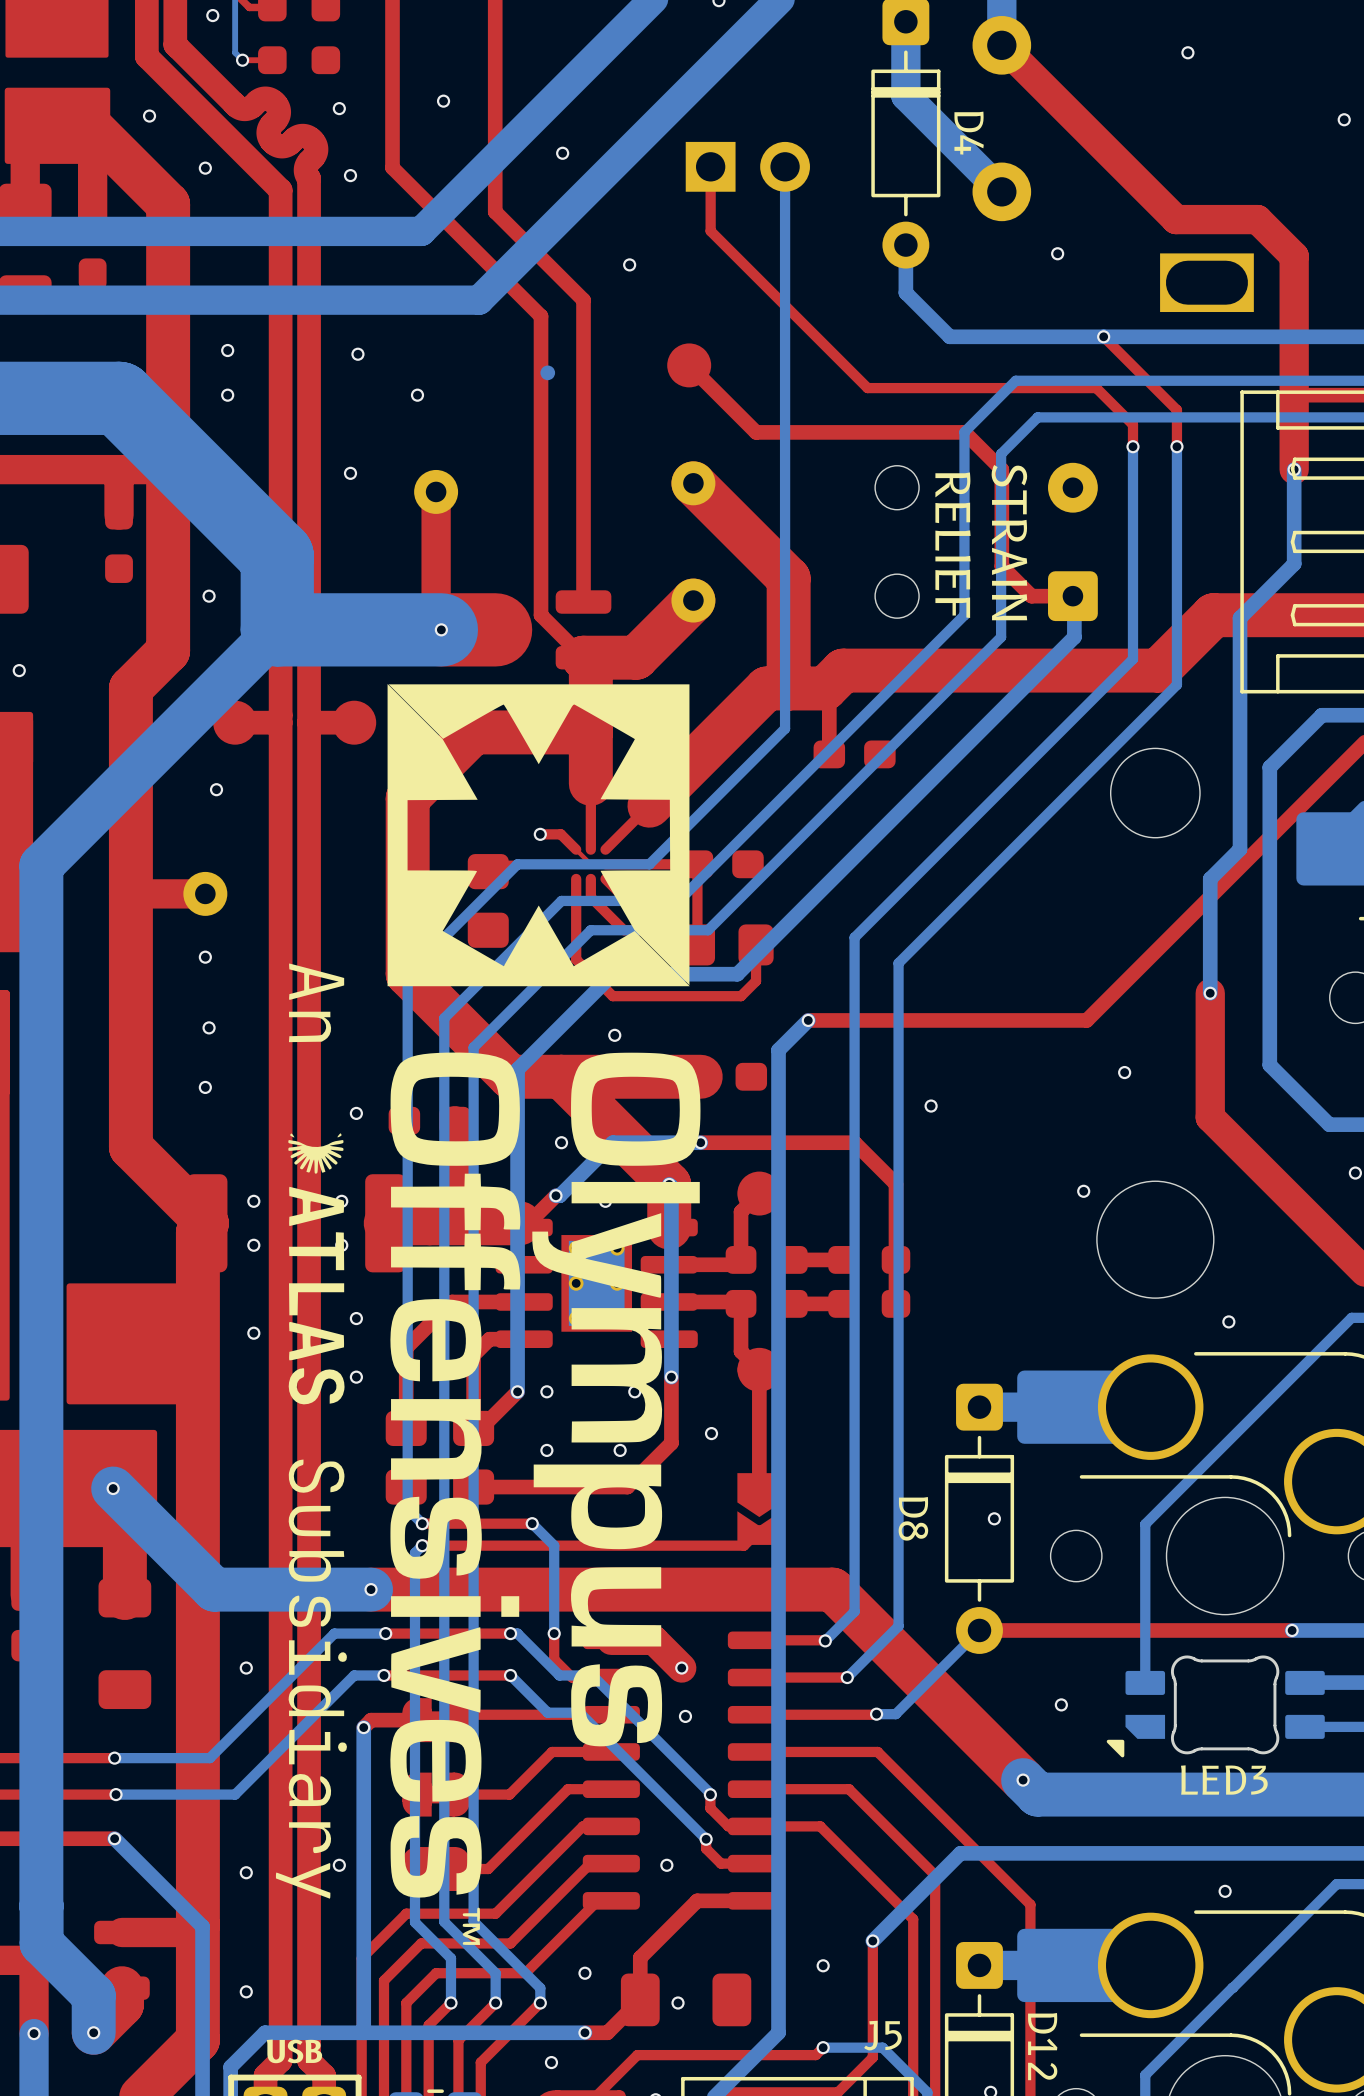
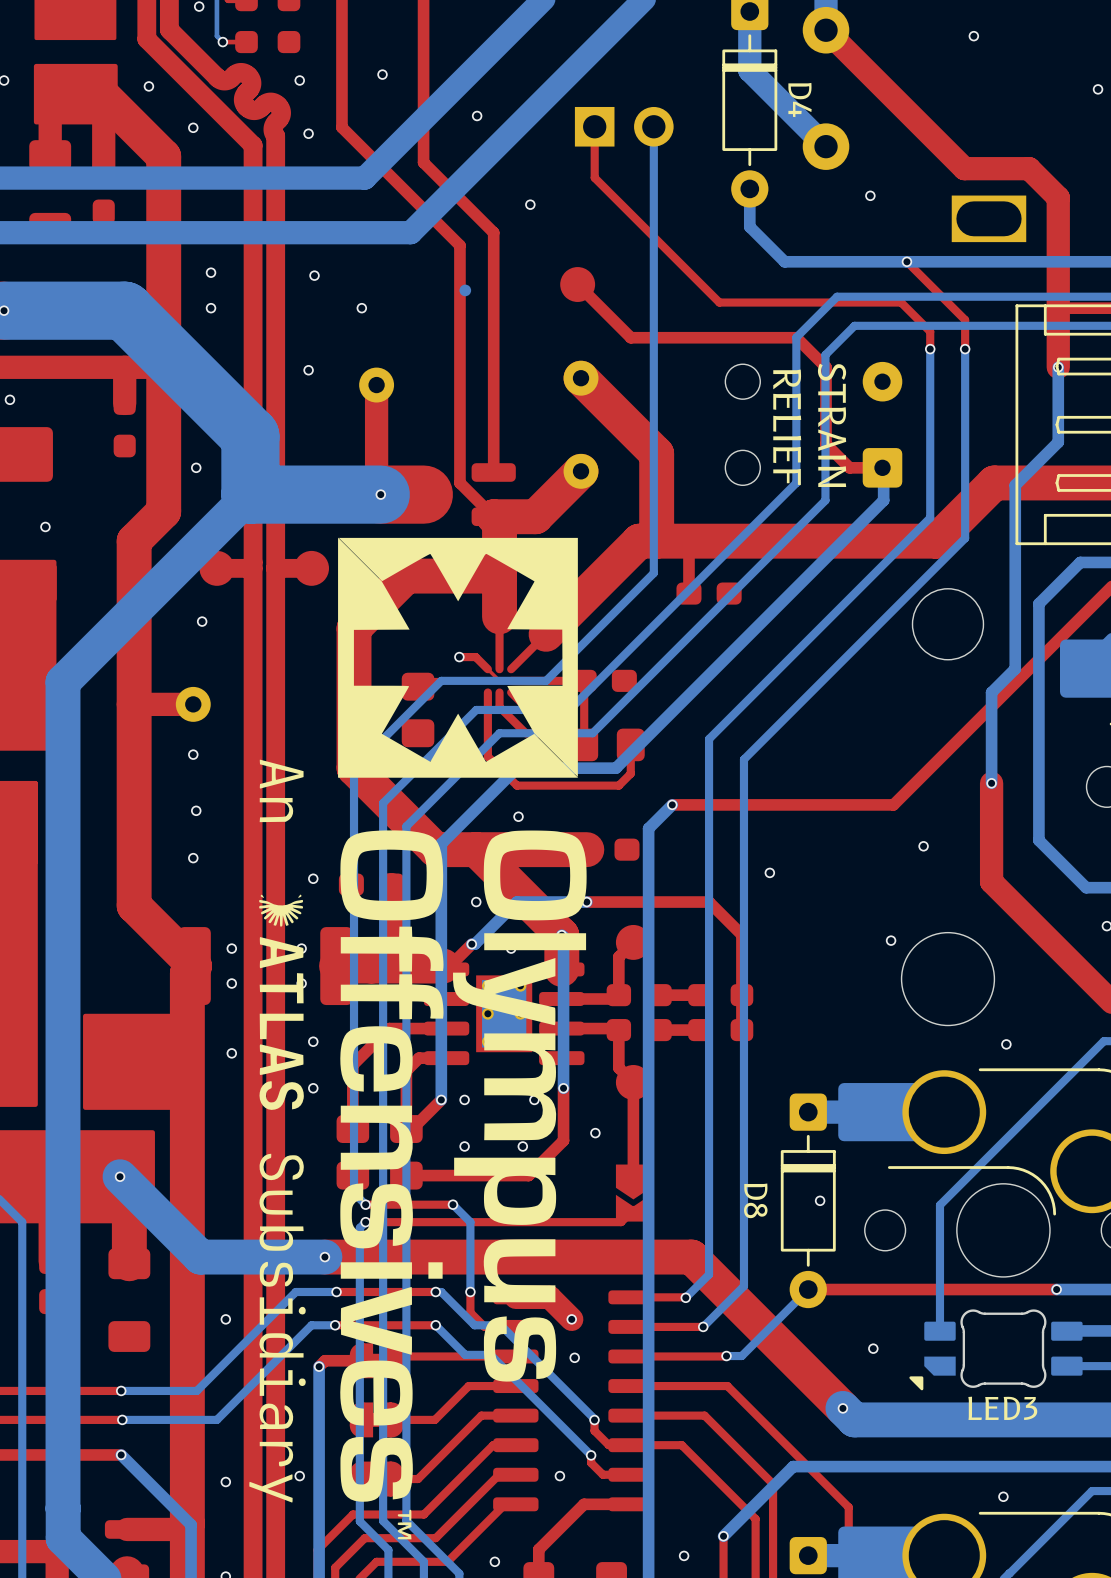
top track: (1158, 670) (843, 670) (825, 688) -> (950, 526) (936, 541) (685, 541)

